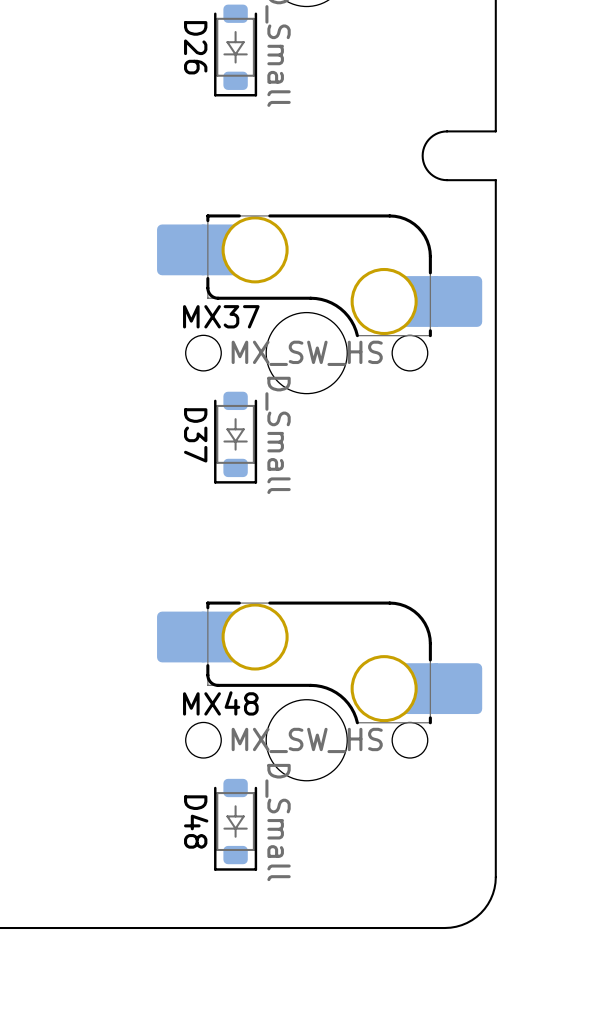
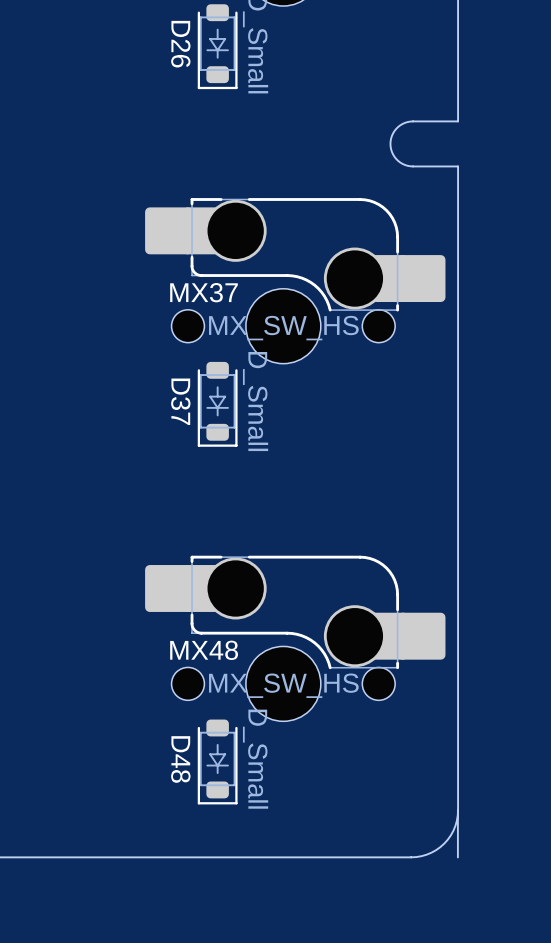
board edge: none -> (457, 810) (457, 857)

